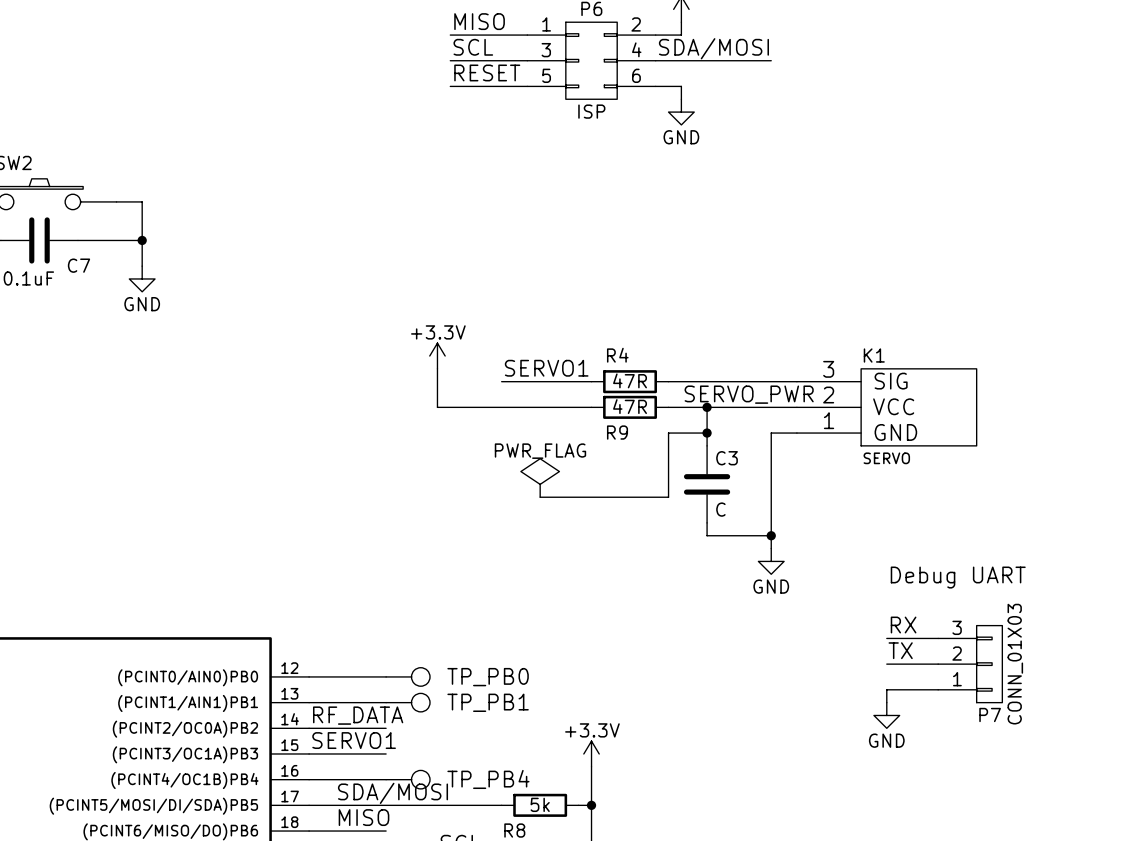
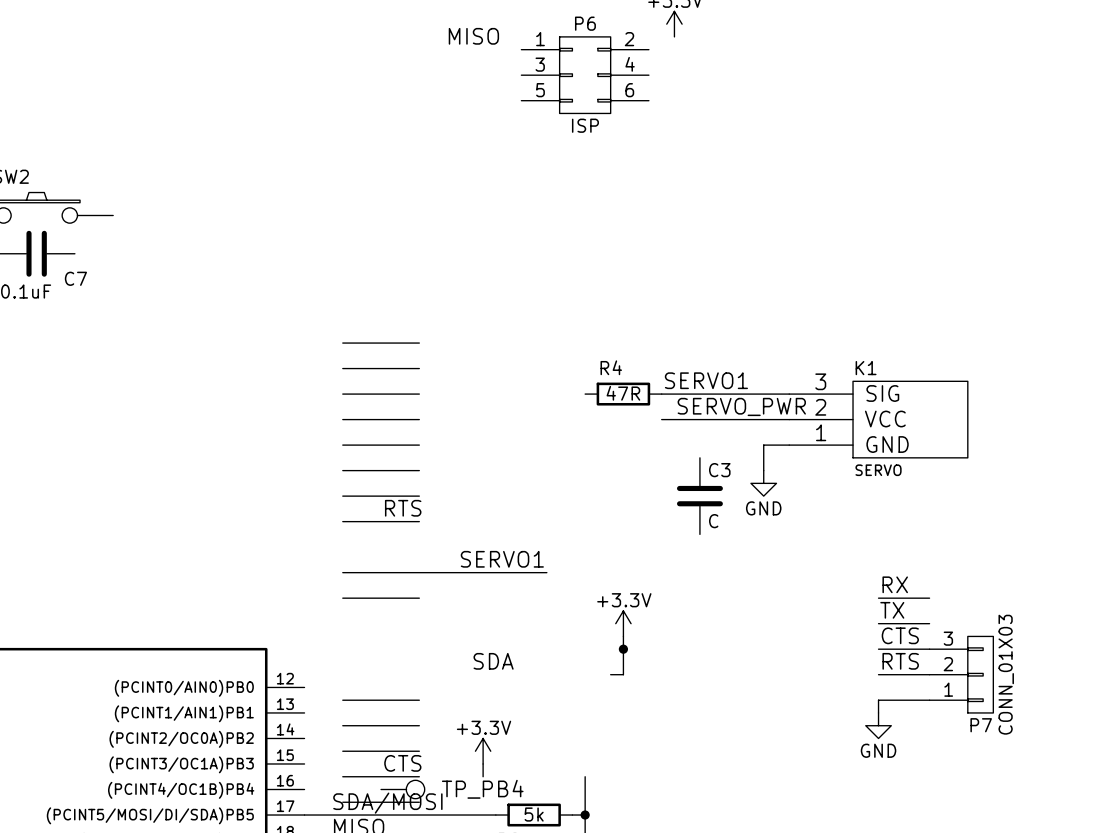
wire: (681, 22) (681, 35) (655, 35) -> none
wire: (450, 35) (527, 35) -> none
label: SCL (473, 47) -> none
label: SDA/MOSI (713, 48) -> none
wire: (450, 60) (527, 60) -> none
wire: (655, 60) (771, 60) -> none
label: RESET (487, 72) -> none
wire: (450, 86) (527, 86) -> none
wire: (655, 86) (681, 86) (681, 99) -> none
power symbol: GND (681, 112) -> none
wire: (116, 201) (142, 201) (142, 266) -> none
wire: (77, 240) (142, 240) -> none
junction: (142, 240) -> none
power symbol: GND (142, 278) -> none
wire: none -> (342, 343) (419, 343)
wire: none -> (342, 368) (419, 368)
power symbol: +3.3V (437, 356) -> none
wire: (437, 368) (437, 407) (591, 407) -> none
label: SERVO1 (546, 368) -> none
label: none -> SERVO1 (706, 380)
wire: none -> (342, 394) (419, 394)
wire: (501, 381) (591, 381) -> none
wire: none -> (342, 419) (419, 419)
R9: 47R (630, 407) -> none
wire: (707, 407) (707, 445) -> none
junction: (707, 407) -> none
wire: none -> (342, 445) (419, 445)
wire: (707, 433) (668, 433) (668, 497) (540, 497) -> none
junction: (707, 433) -> none
wire: none -> (342, 470) (419, 470)
wire: (771, 458) (771, 548) -> none
power symbol: PWR_FLAG (540, 477) -> none
wire: none -> (342, 496) (419, 496)
label: none -> RTS (403, 508)
wire: none -> (342, 521) (419, 521)
wire: (707, 522) (707, 535) (771, 535) -> none
junction: (771, 535) -> none
label: none -> SERVO1 (502, 559)
wire: none -> (342, 572) (546, 572)
power symbol position: GND (771, 561) -> GND (763, 483)
label: none -> RX (895, 584)
text: Debug UART (958, 577) -> none
wire: none -> (342, 598) (419, 598)
wire: none -> (878, 598) (929, 598)
label: none -> TX (892, 610)
power symbol: none -> +3.3V (623, 623)
wire: none -> (878, 623) (929, 623)
wire: none -> (623, 636) (623, 674) (610, 674)
label: RX (903, 625) -> CTS (900, 635)
junction: none -> (623, 649)
label: none -> SDA (493, 661)
label: TX (900, 650) -> RTS (900, 661)
wire: (309, 676) (386, 676) -> (342, 700) (419, 700)
TP_PB0: (408, 676) -> none
wire: (309, 702) (386, 702) -> (342, 725) (419, 725)
TP_PB1: (408, 702) -> none
label: RF_DATA (358, 715) -> none
wire: (309, 728) (386, 728) -> (342, 751) (419, 751)
label: SERVO1 (354, 740) -> none
power symbol: none -> +3.3V (483, 751)
wire: (309, 753) (386, 753) -> (342, 776) (419, 776)
label: none -> CTS (402, 763)
wire: none -> (483, 763) (483, 776)
power symbol: +3.3V (591, 753) -> none
wire: (309, 779) (386, 779) -> (342, 802) (419, 802)

